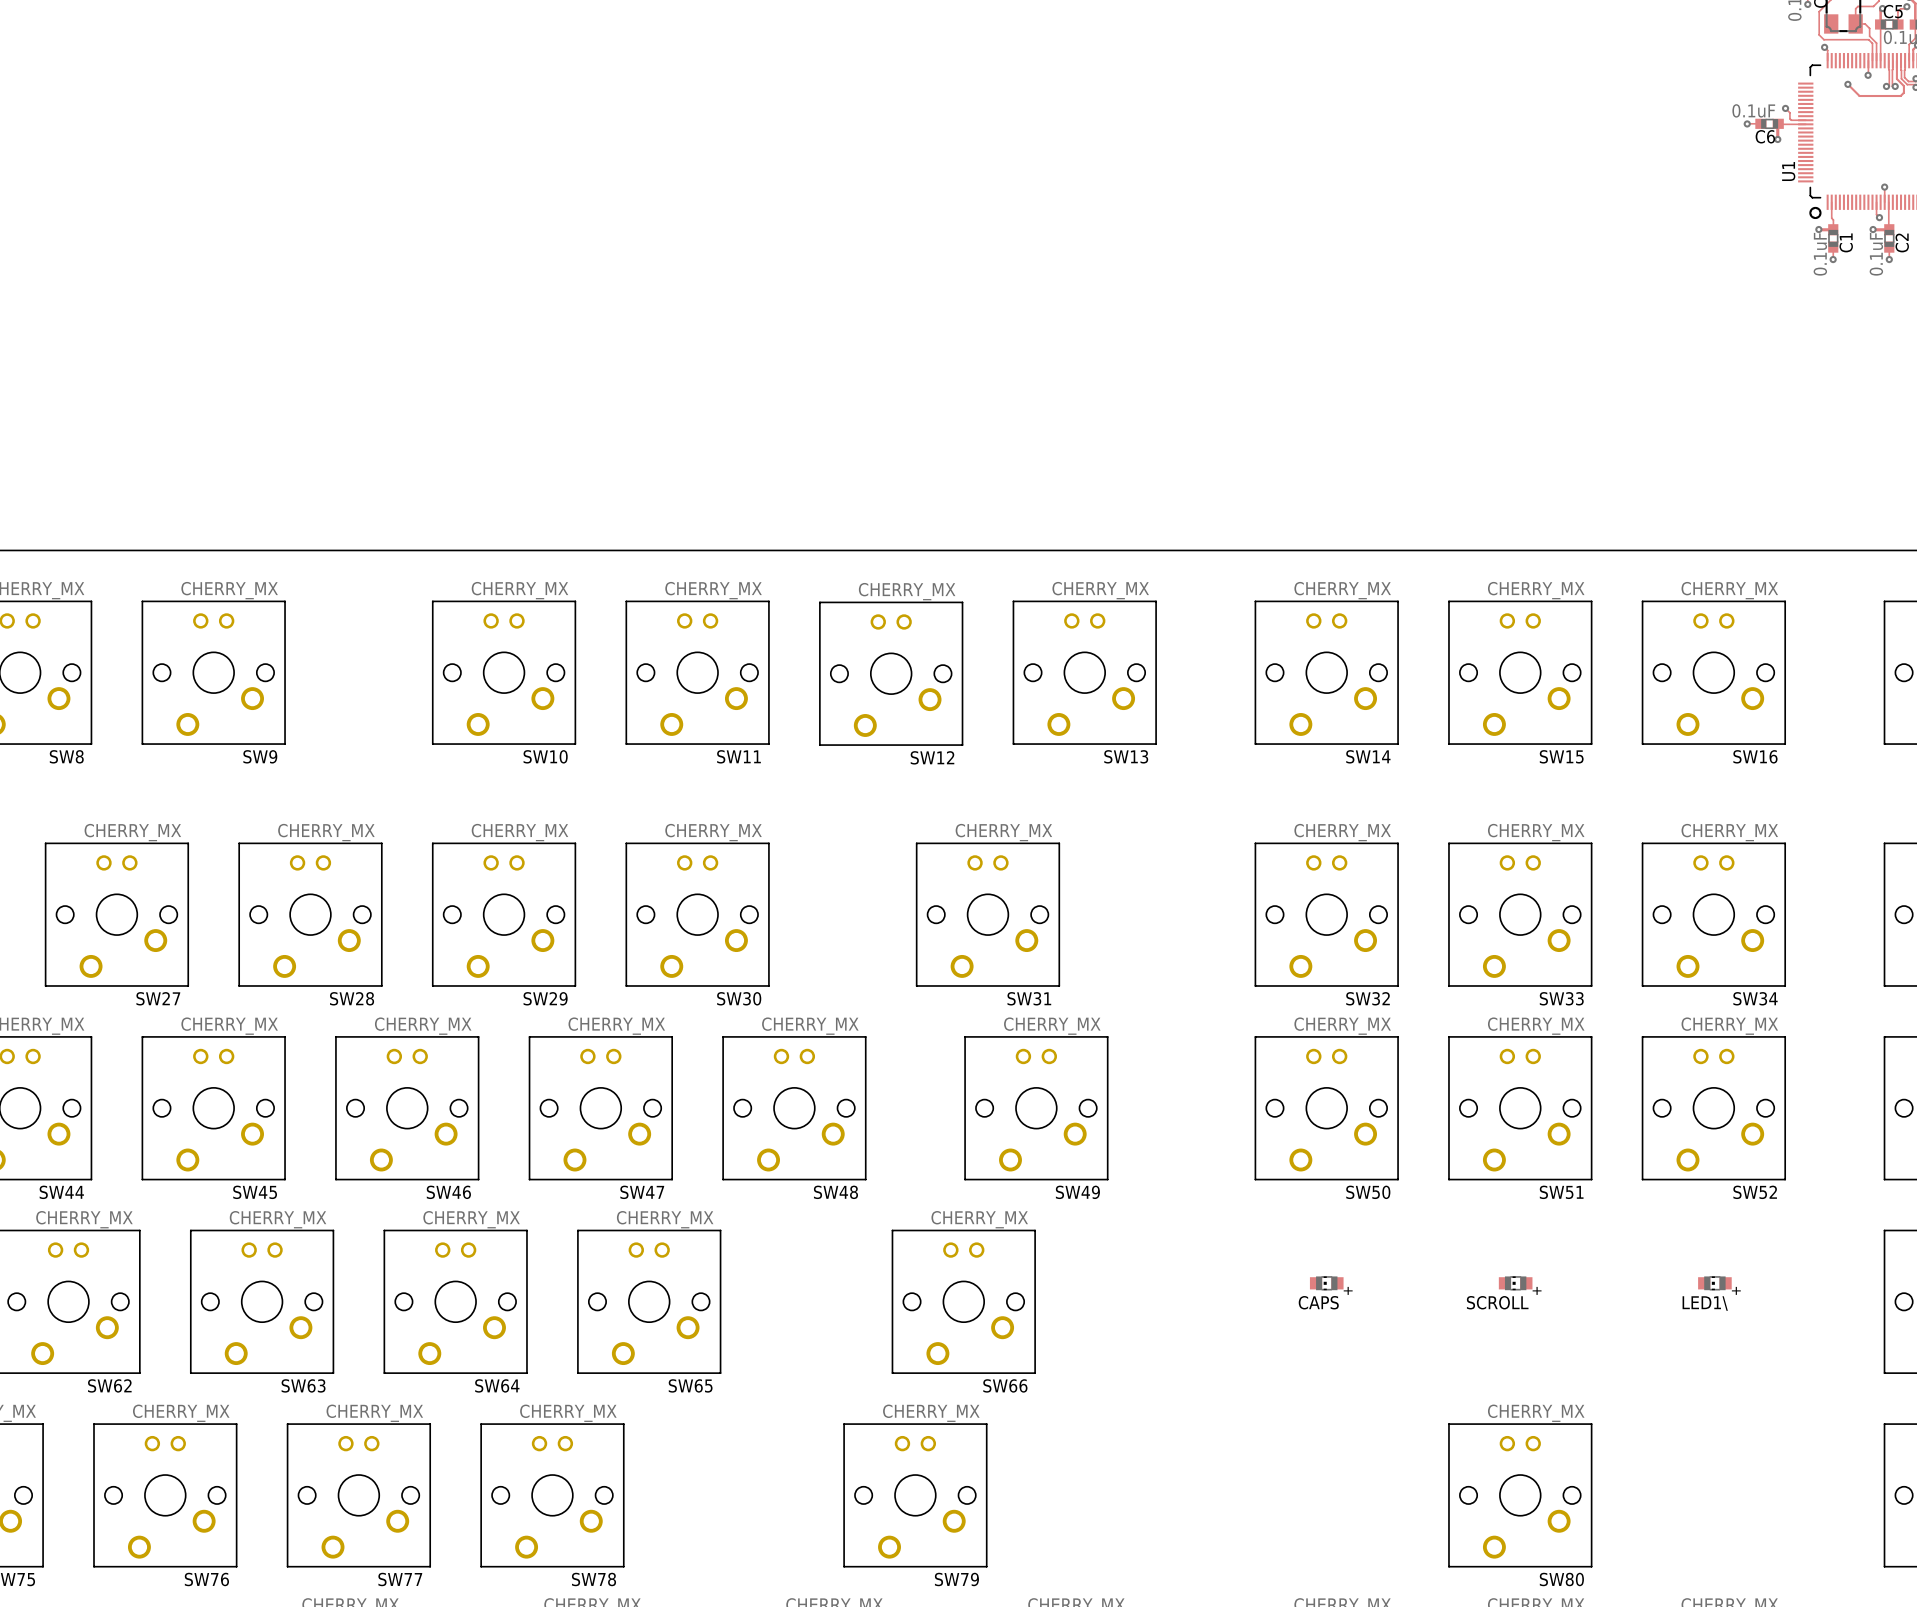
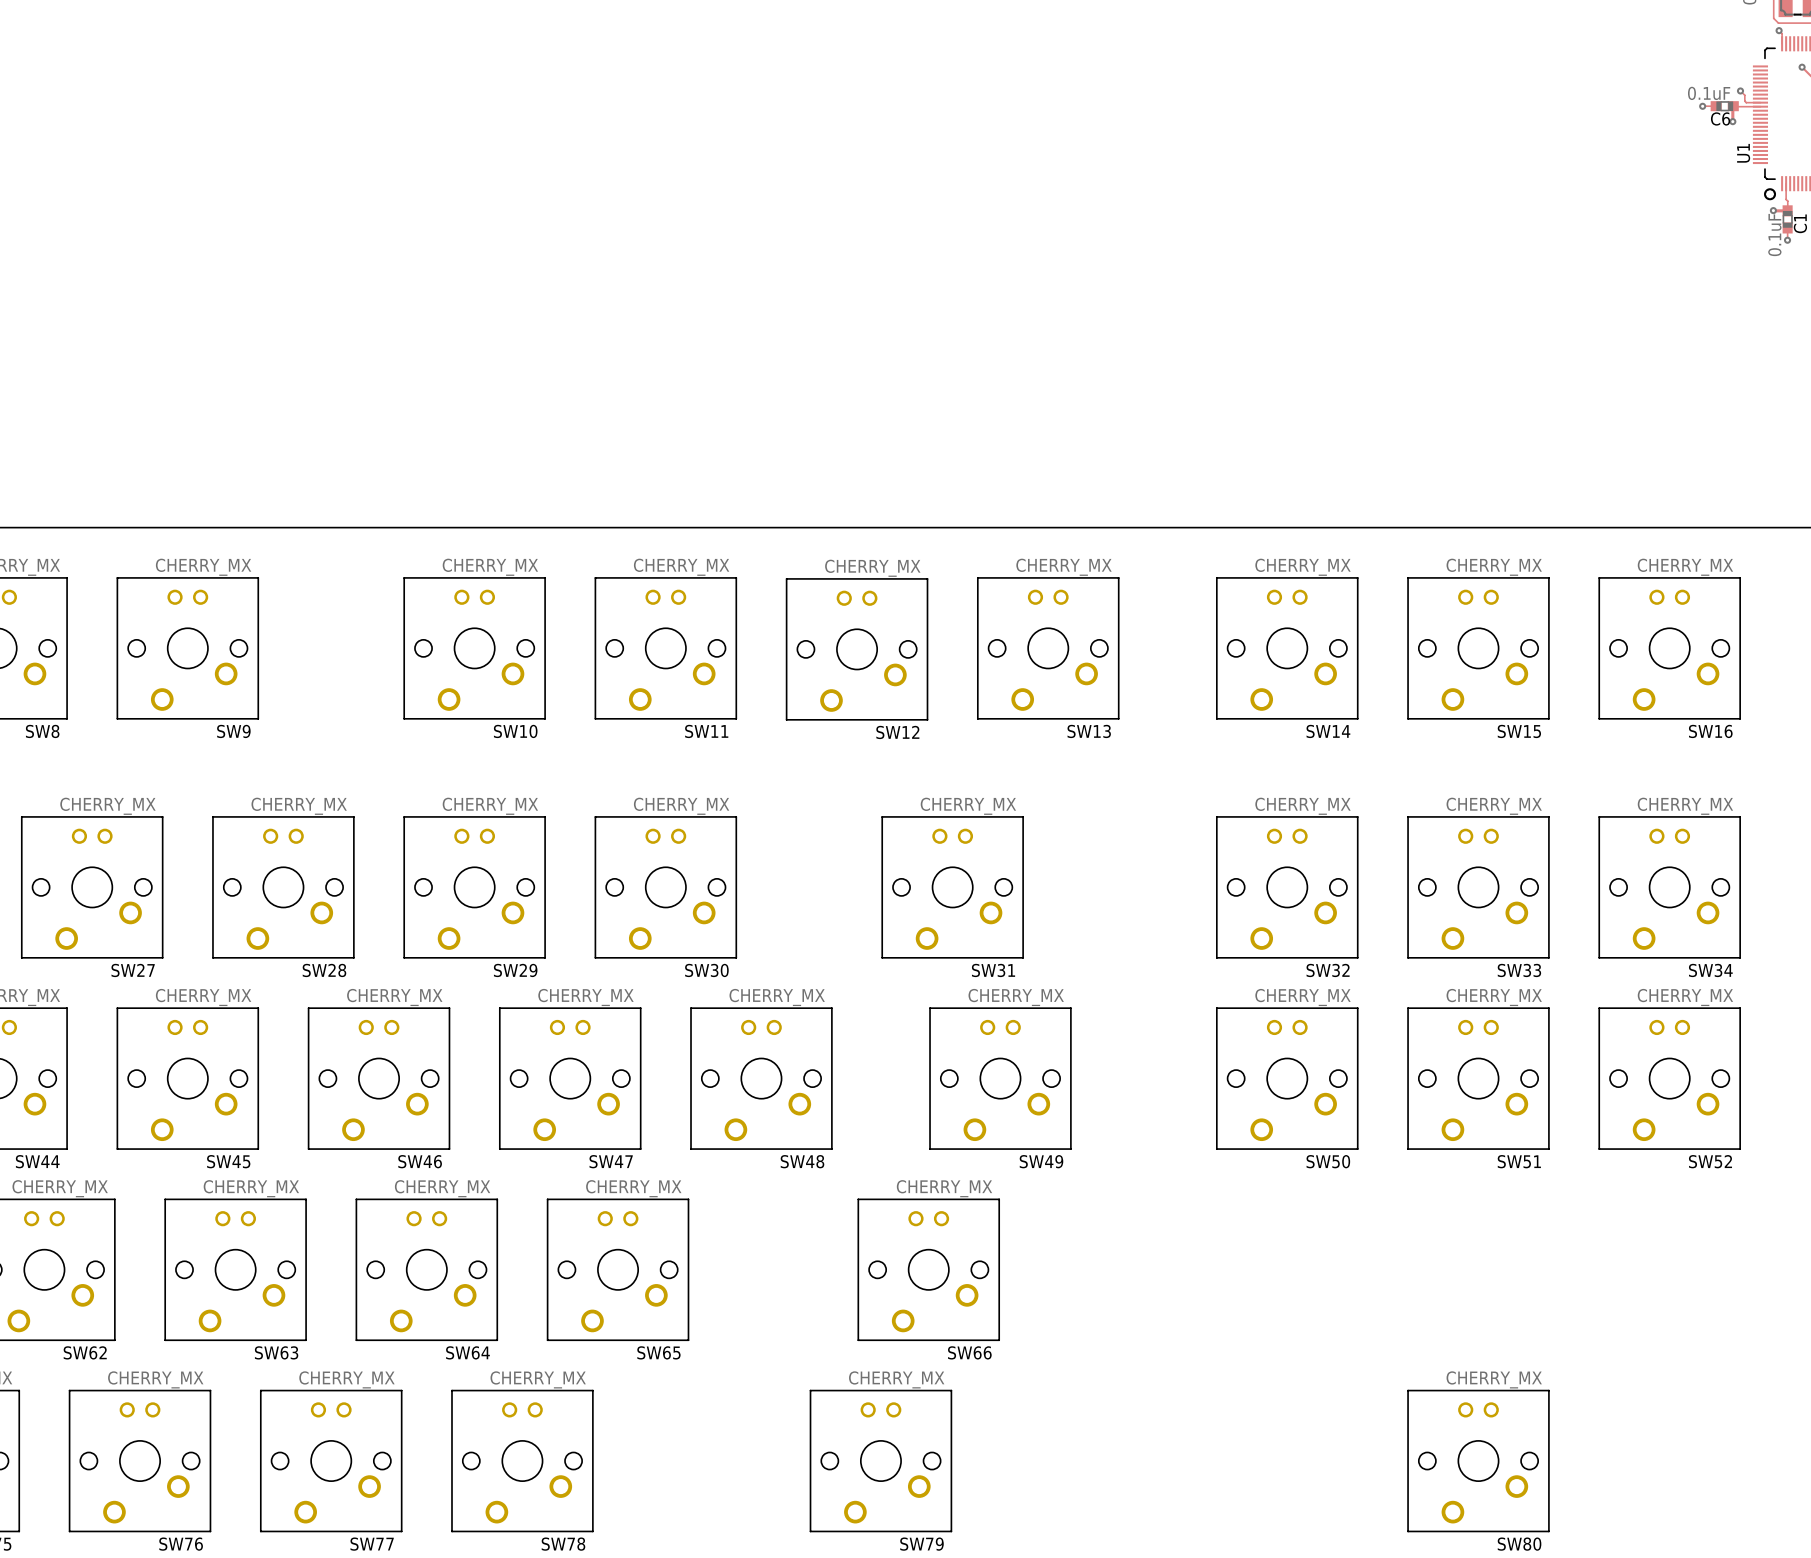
CAPS: (1326, 1283) -> none
SCROLL: (1515, 1283) -> none
LED1\: (1714, 1283) -> none

